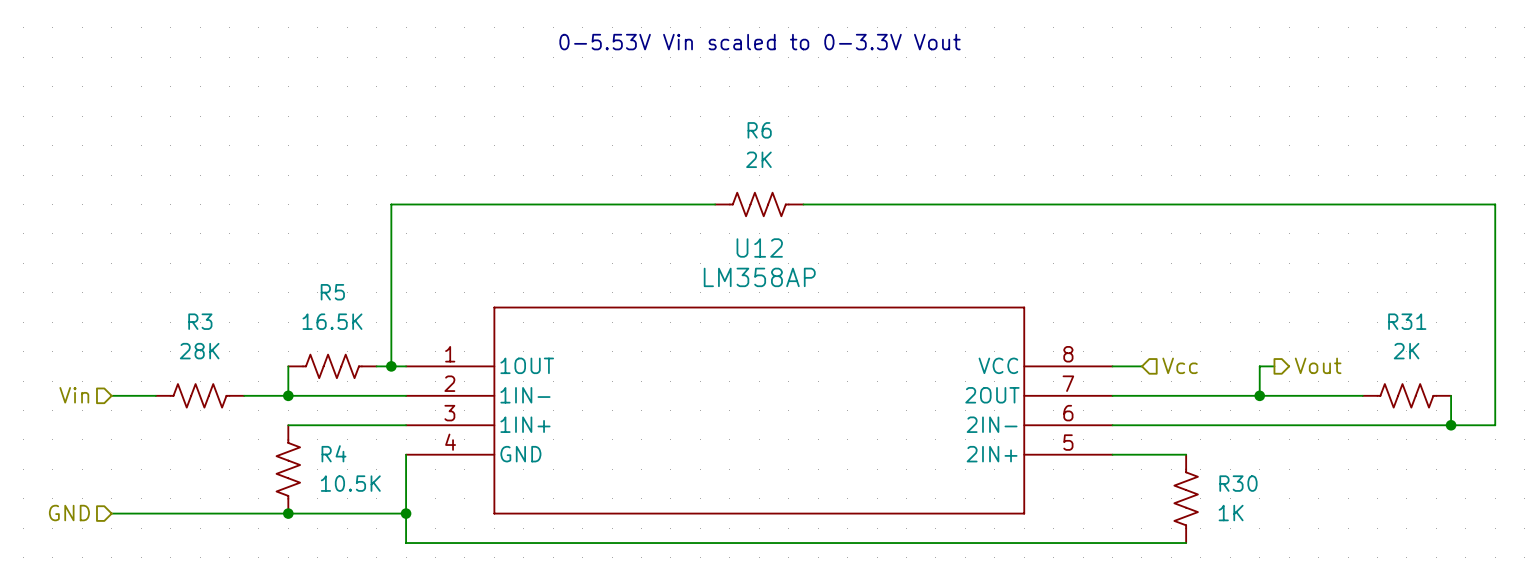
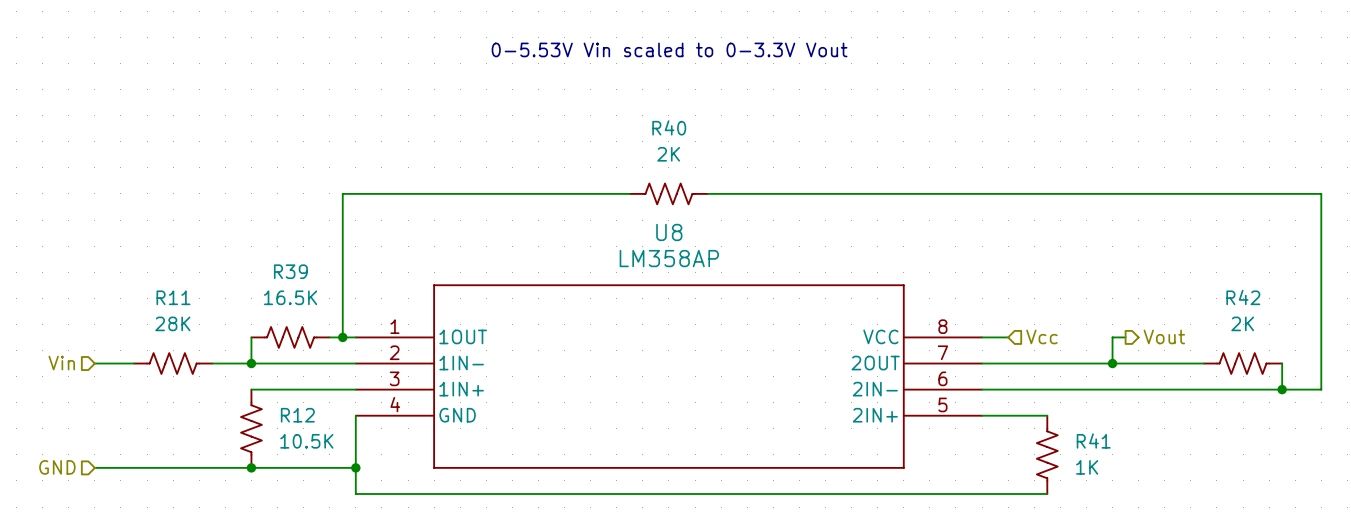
R6 name: R6 (759, 130) -> R40 (669, 127)
U12 name: U12 (759, 247) -> U8 (669, 232)
R5 name: R5 (332, 292) -> R39 (290, 271)
R3 name: R3 (200, 321) -> R11 (173, 297)
R31 name: R31 (1407, 321) -> R42 (1243, 297)
R4 name: R4 (333, 453) -> R12 (297, 415)
R30 name: R30 (1238, 483) -> R41 (1093, 441)

